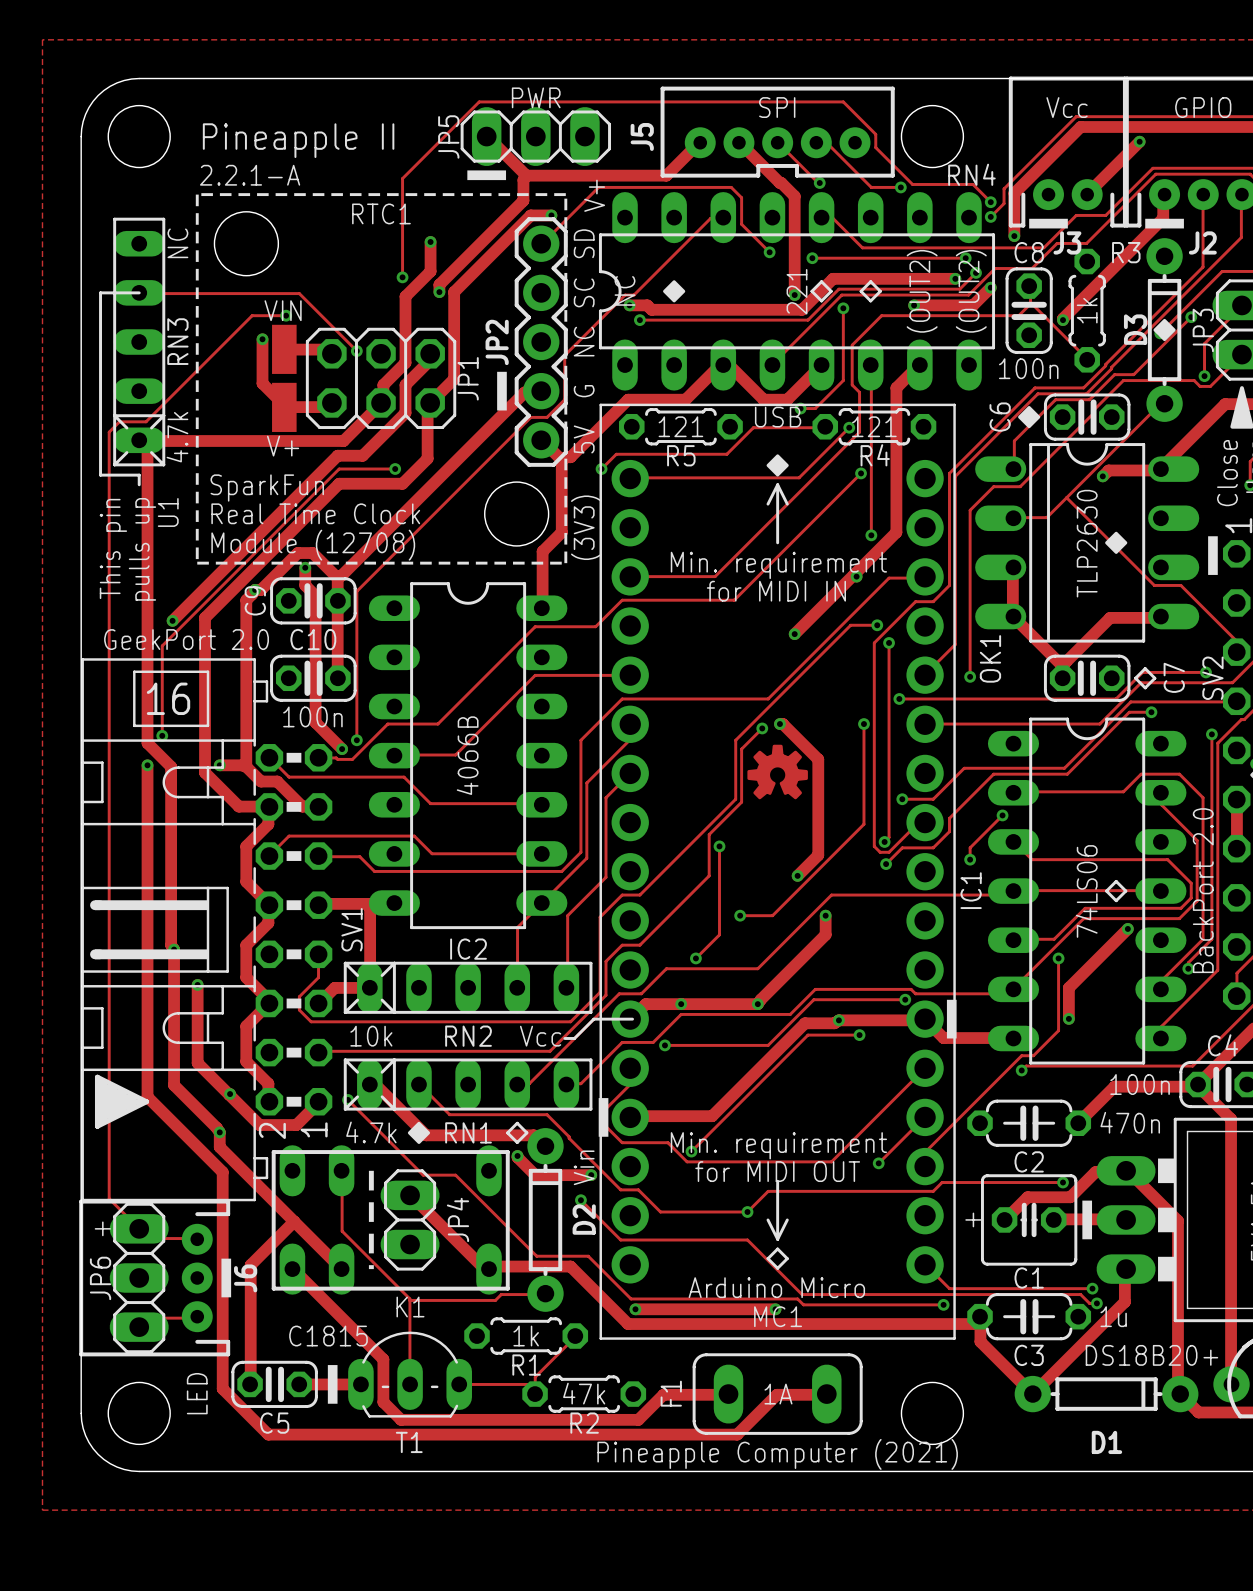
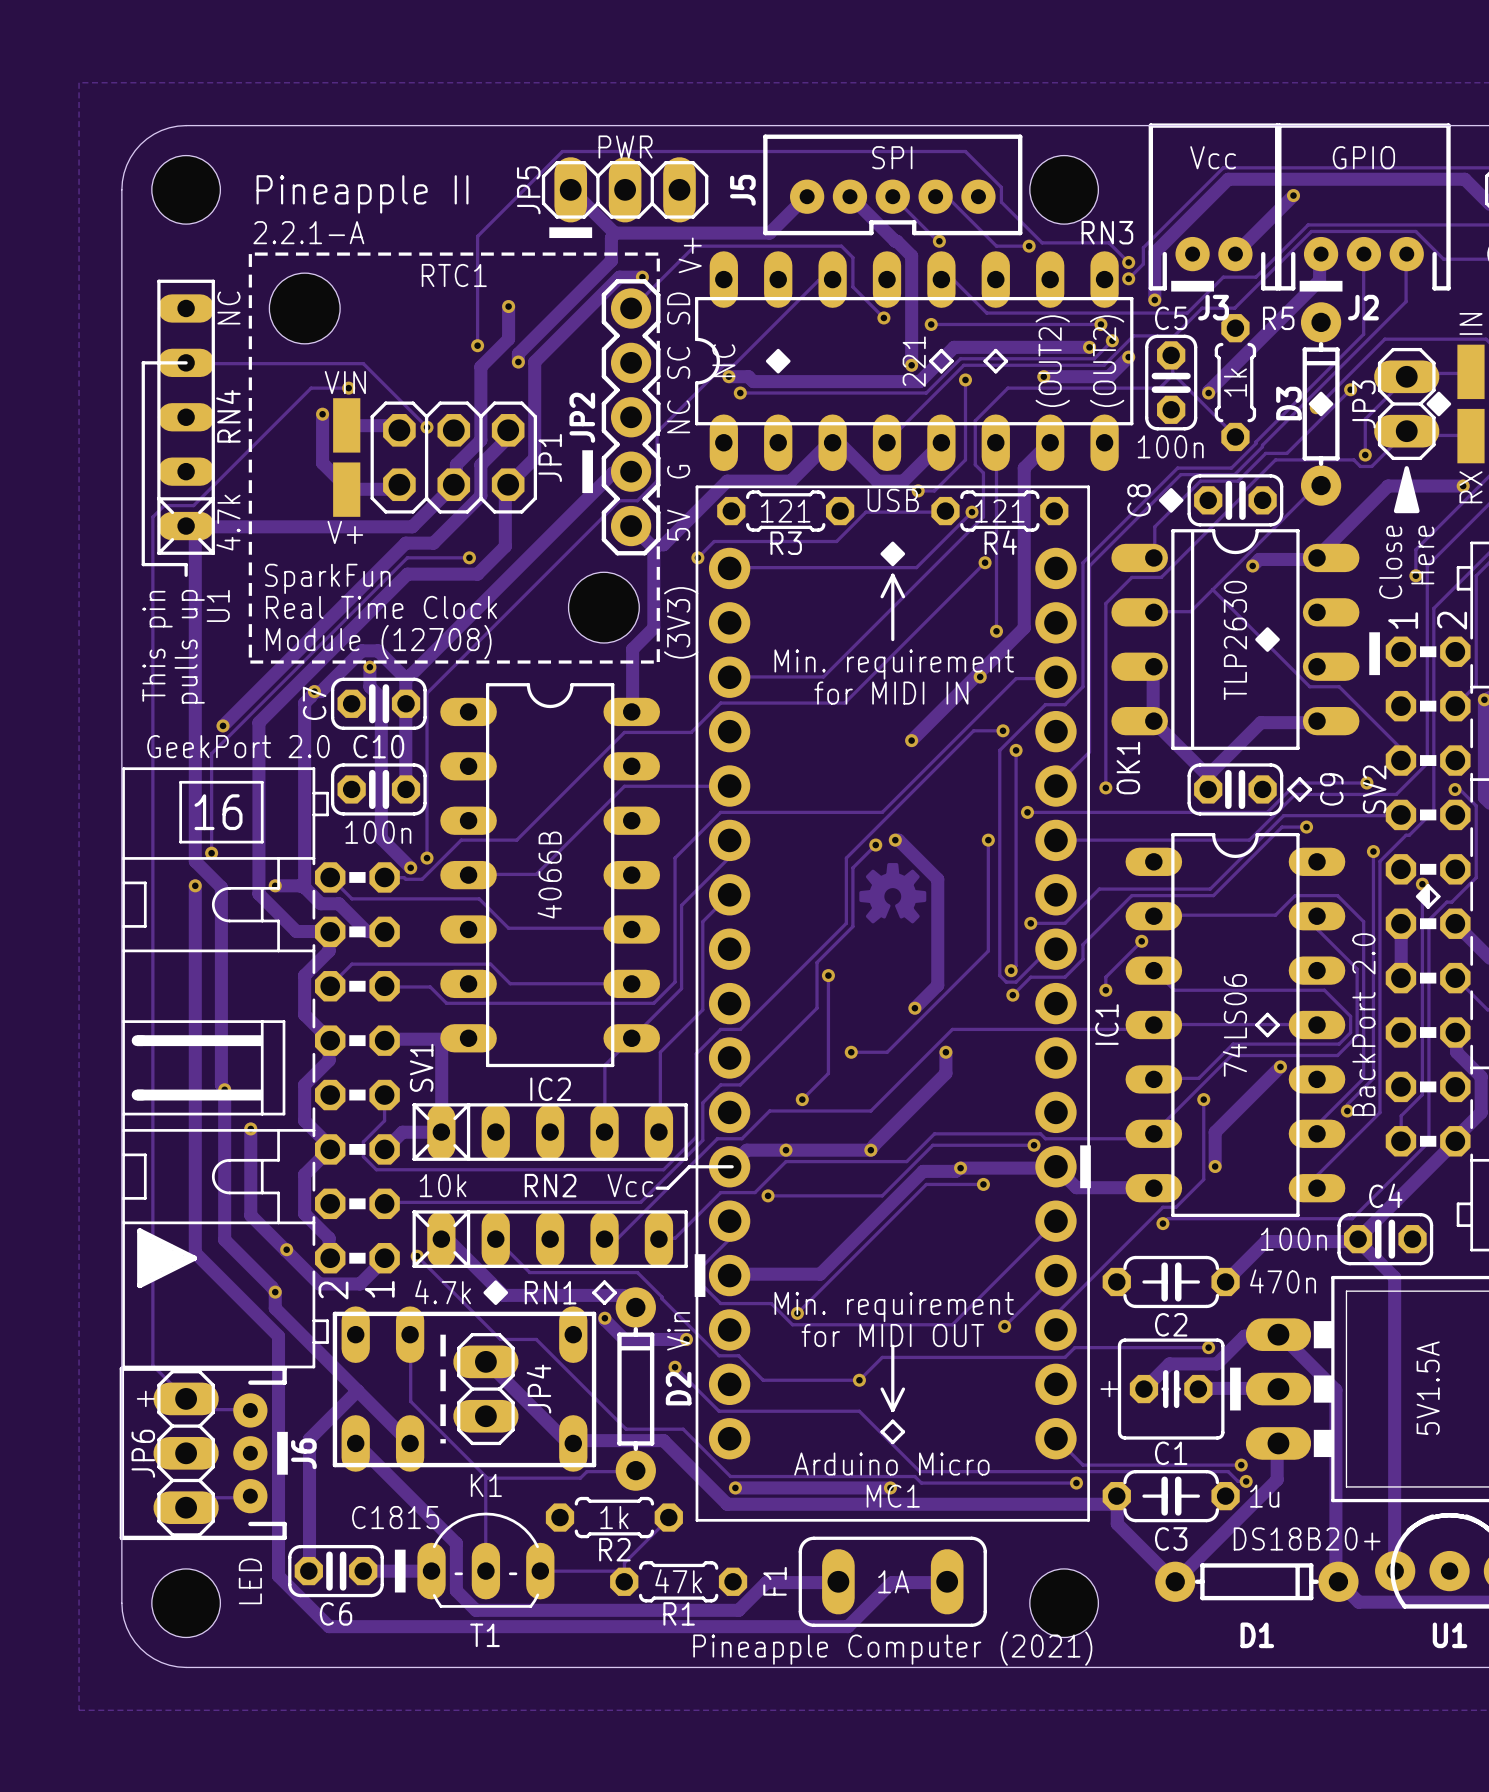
RN4 name: RN4 (971, 174) -> RN3 (1107, 232)
C8 name: C8 (1029, 252) -> C5 (1171, 318)
R3 name: R3 (1126, 252) -> R5 (1278, 318)
RN3 name: RN3 (177, 341) -> RN4 (228, 416)
C6 name: C6 (1000, 417) -> C8 (1139, 500)
R5 name: R5 (681, 455) -> R3 (786, 543)
C9 name: C9 (255, 600) -> C7 (314, 703)
C7 name: C7 (1174, 677) -> C9 (1331, 789)
R1 name: R1 (526, 1365) -> R2 (614, 1549)
C5 name: C5 (274, 1423) -> C6 (336, 1613)
R2 name: R2 (584, 1423) -> R1 (679, 1613)

